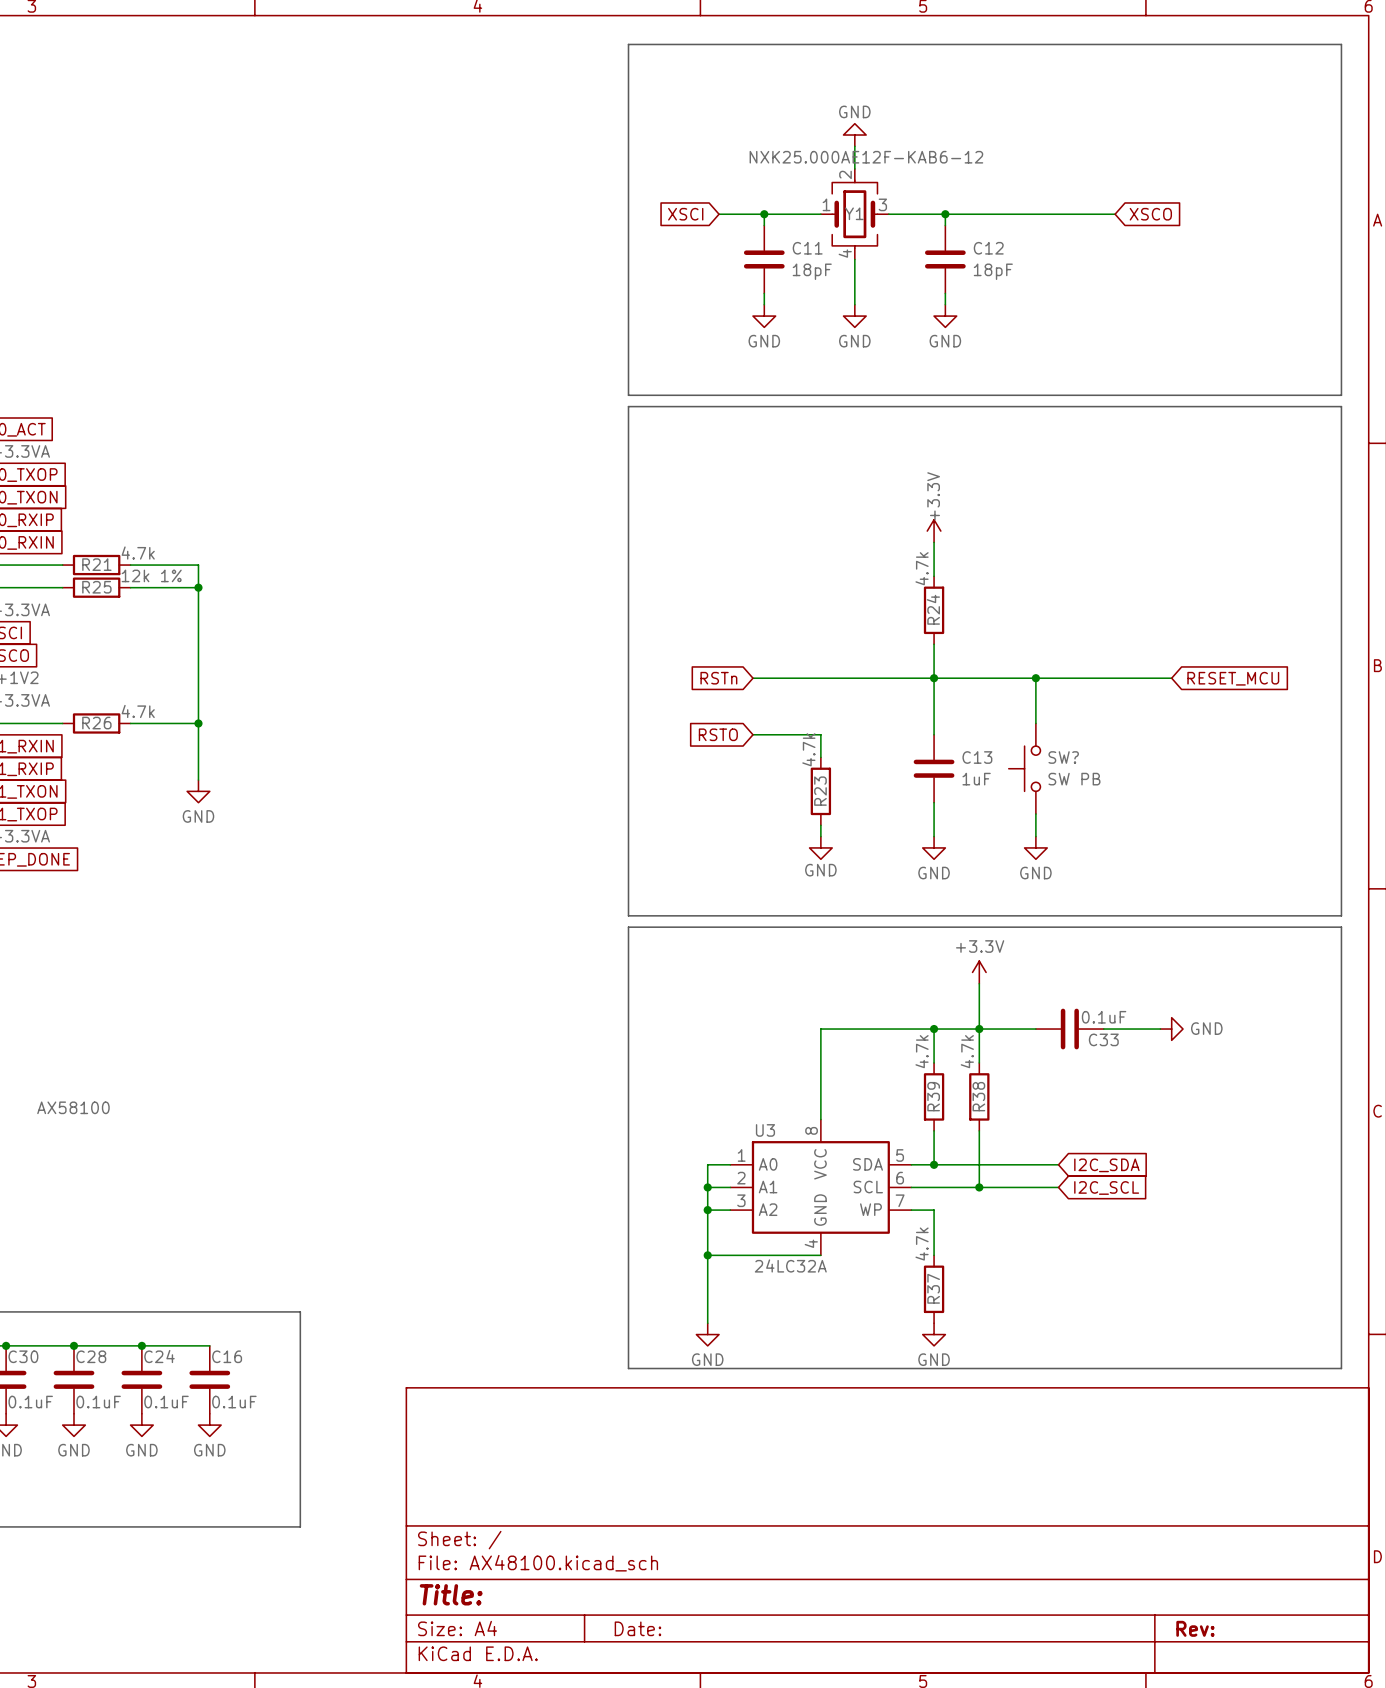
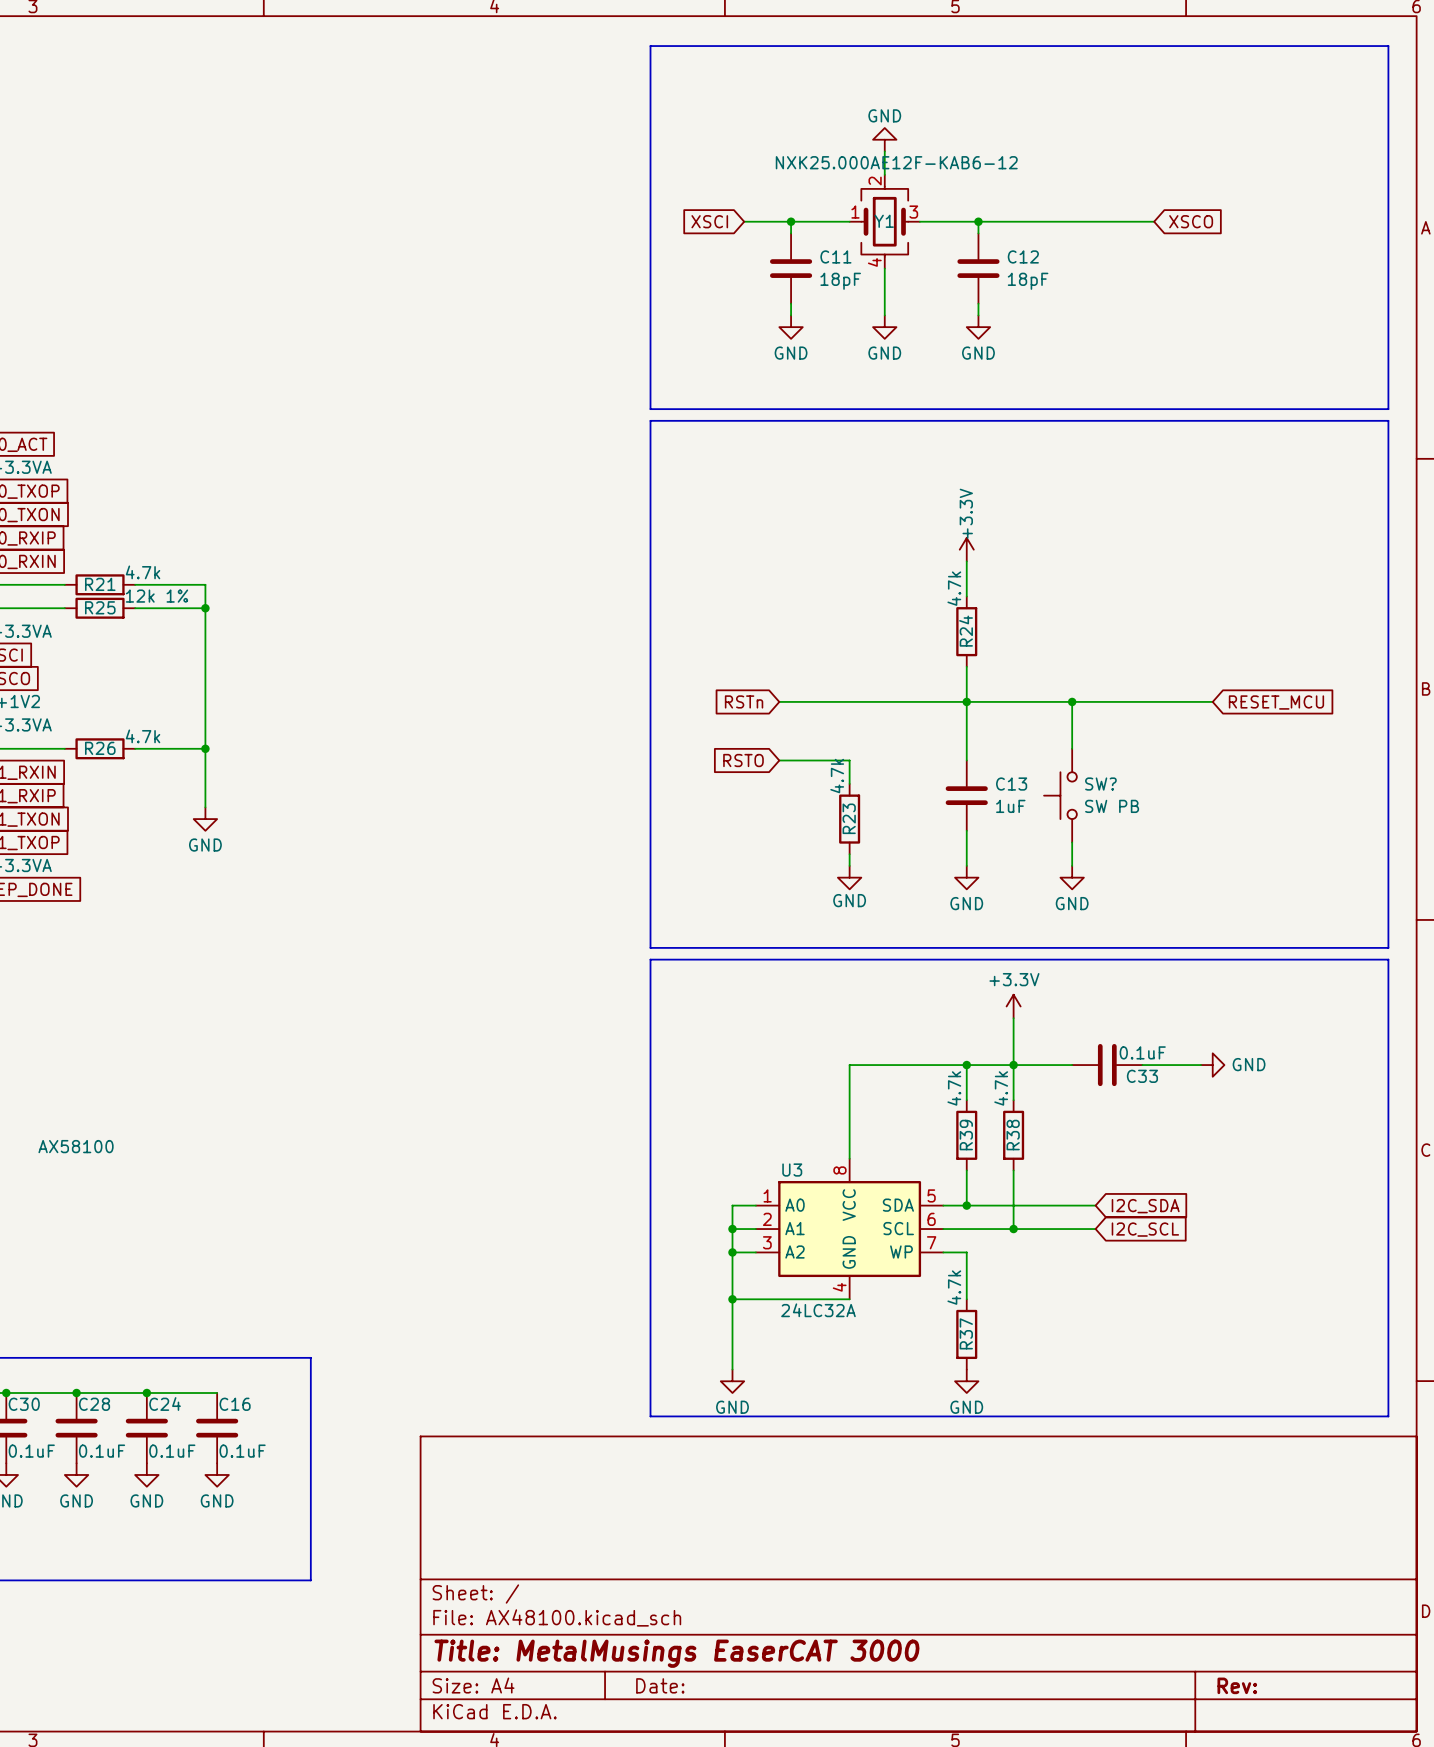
title block: Title: (451, 1594) -> Title: MetalMusings EaserCAT 3000 (676, 1653)

